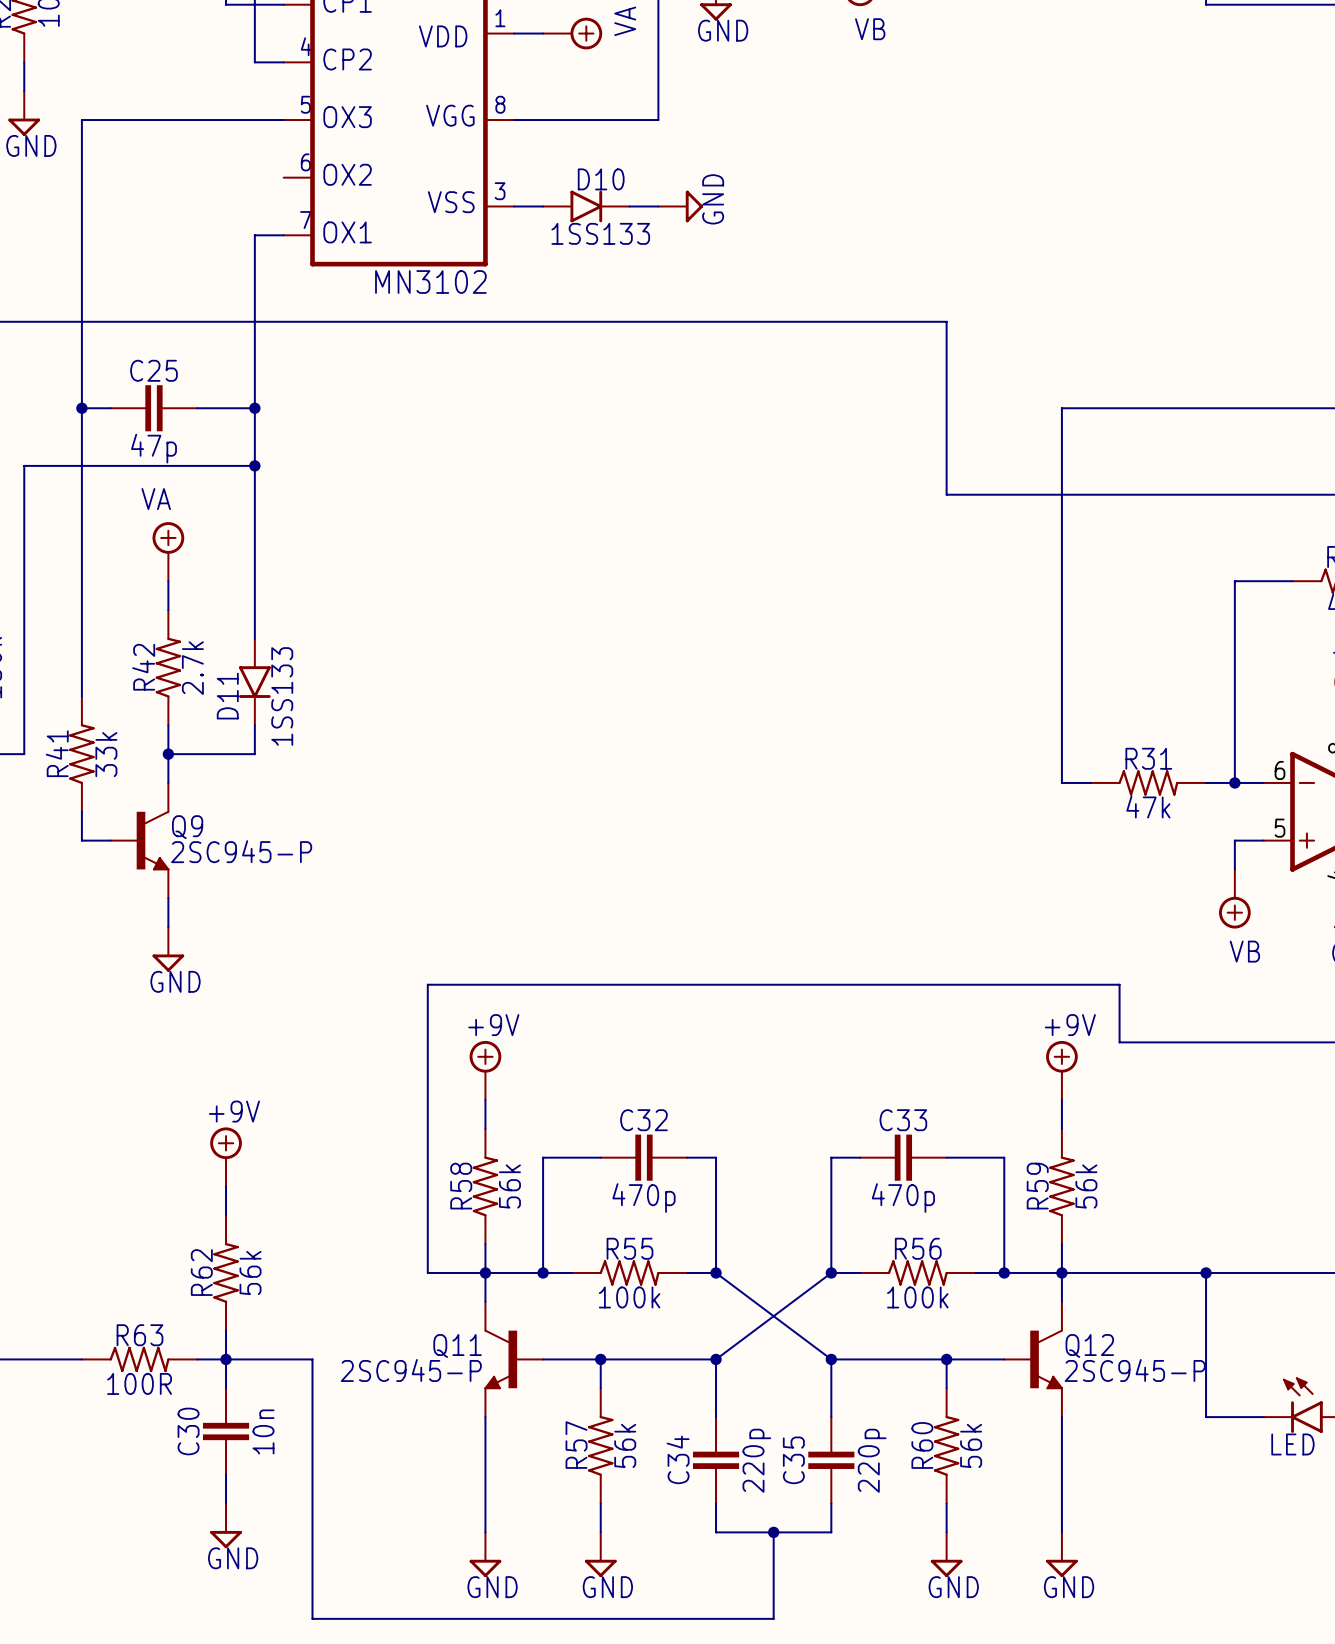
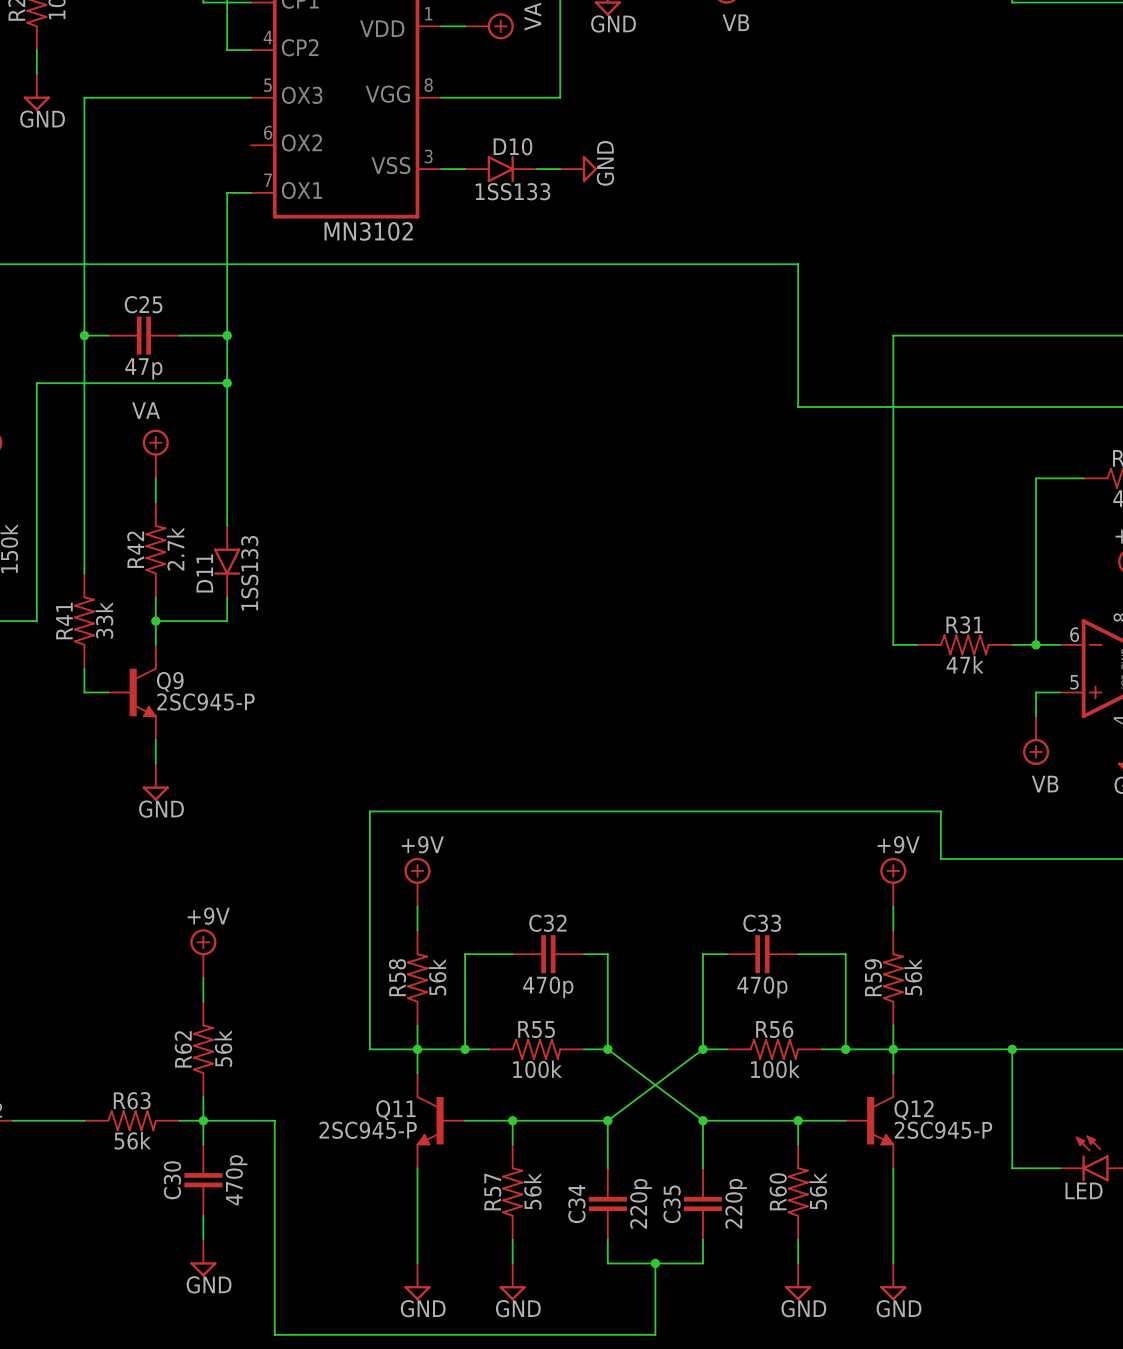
R63 value: 100R (139, 1383) -> 56k (132, 1140)
C30 value: 10n (263, 1431) -> 470p (236, 1180)

